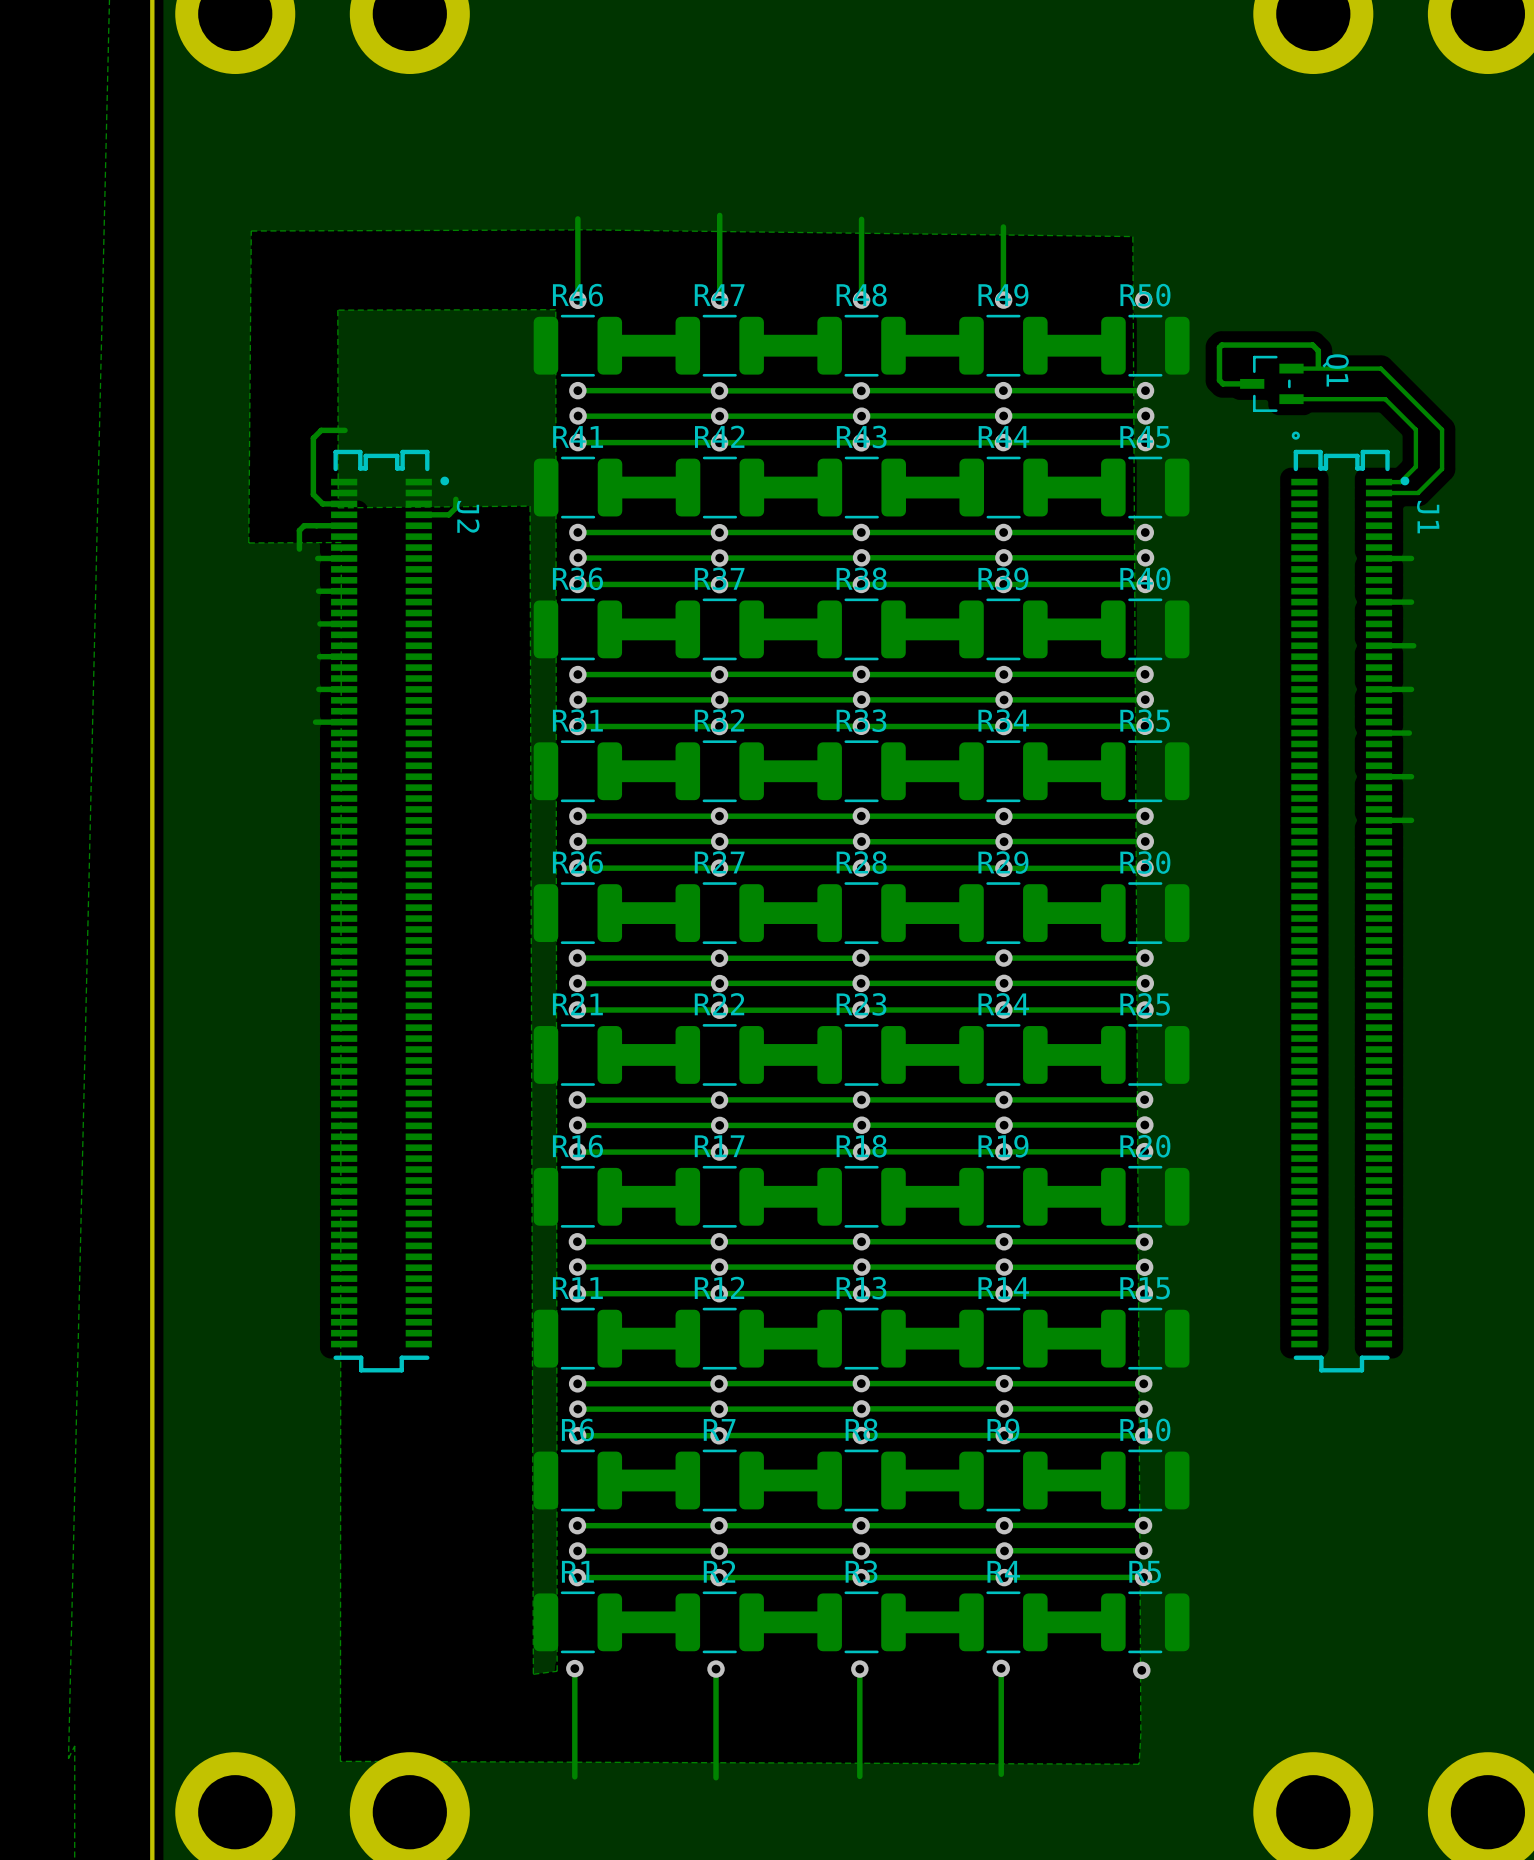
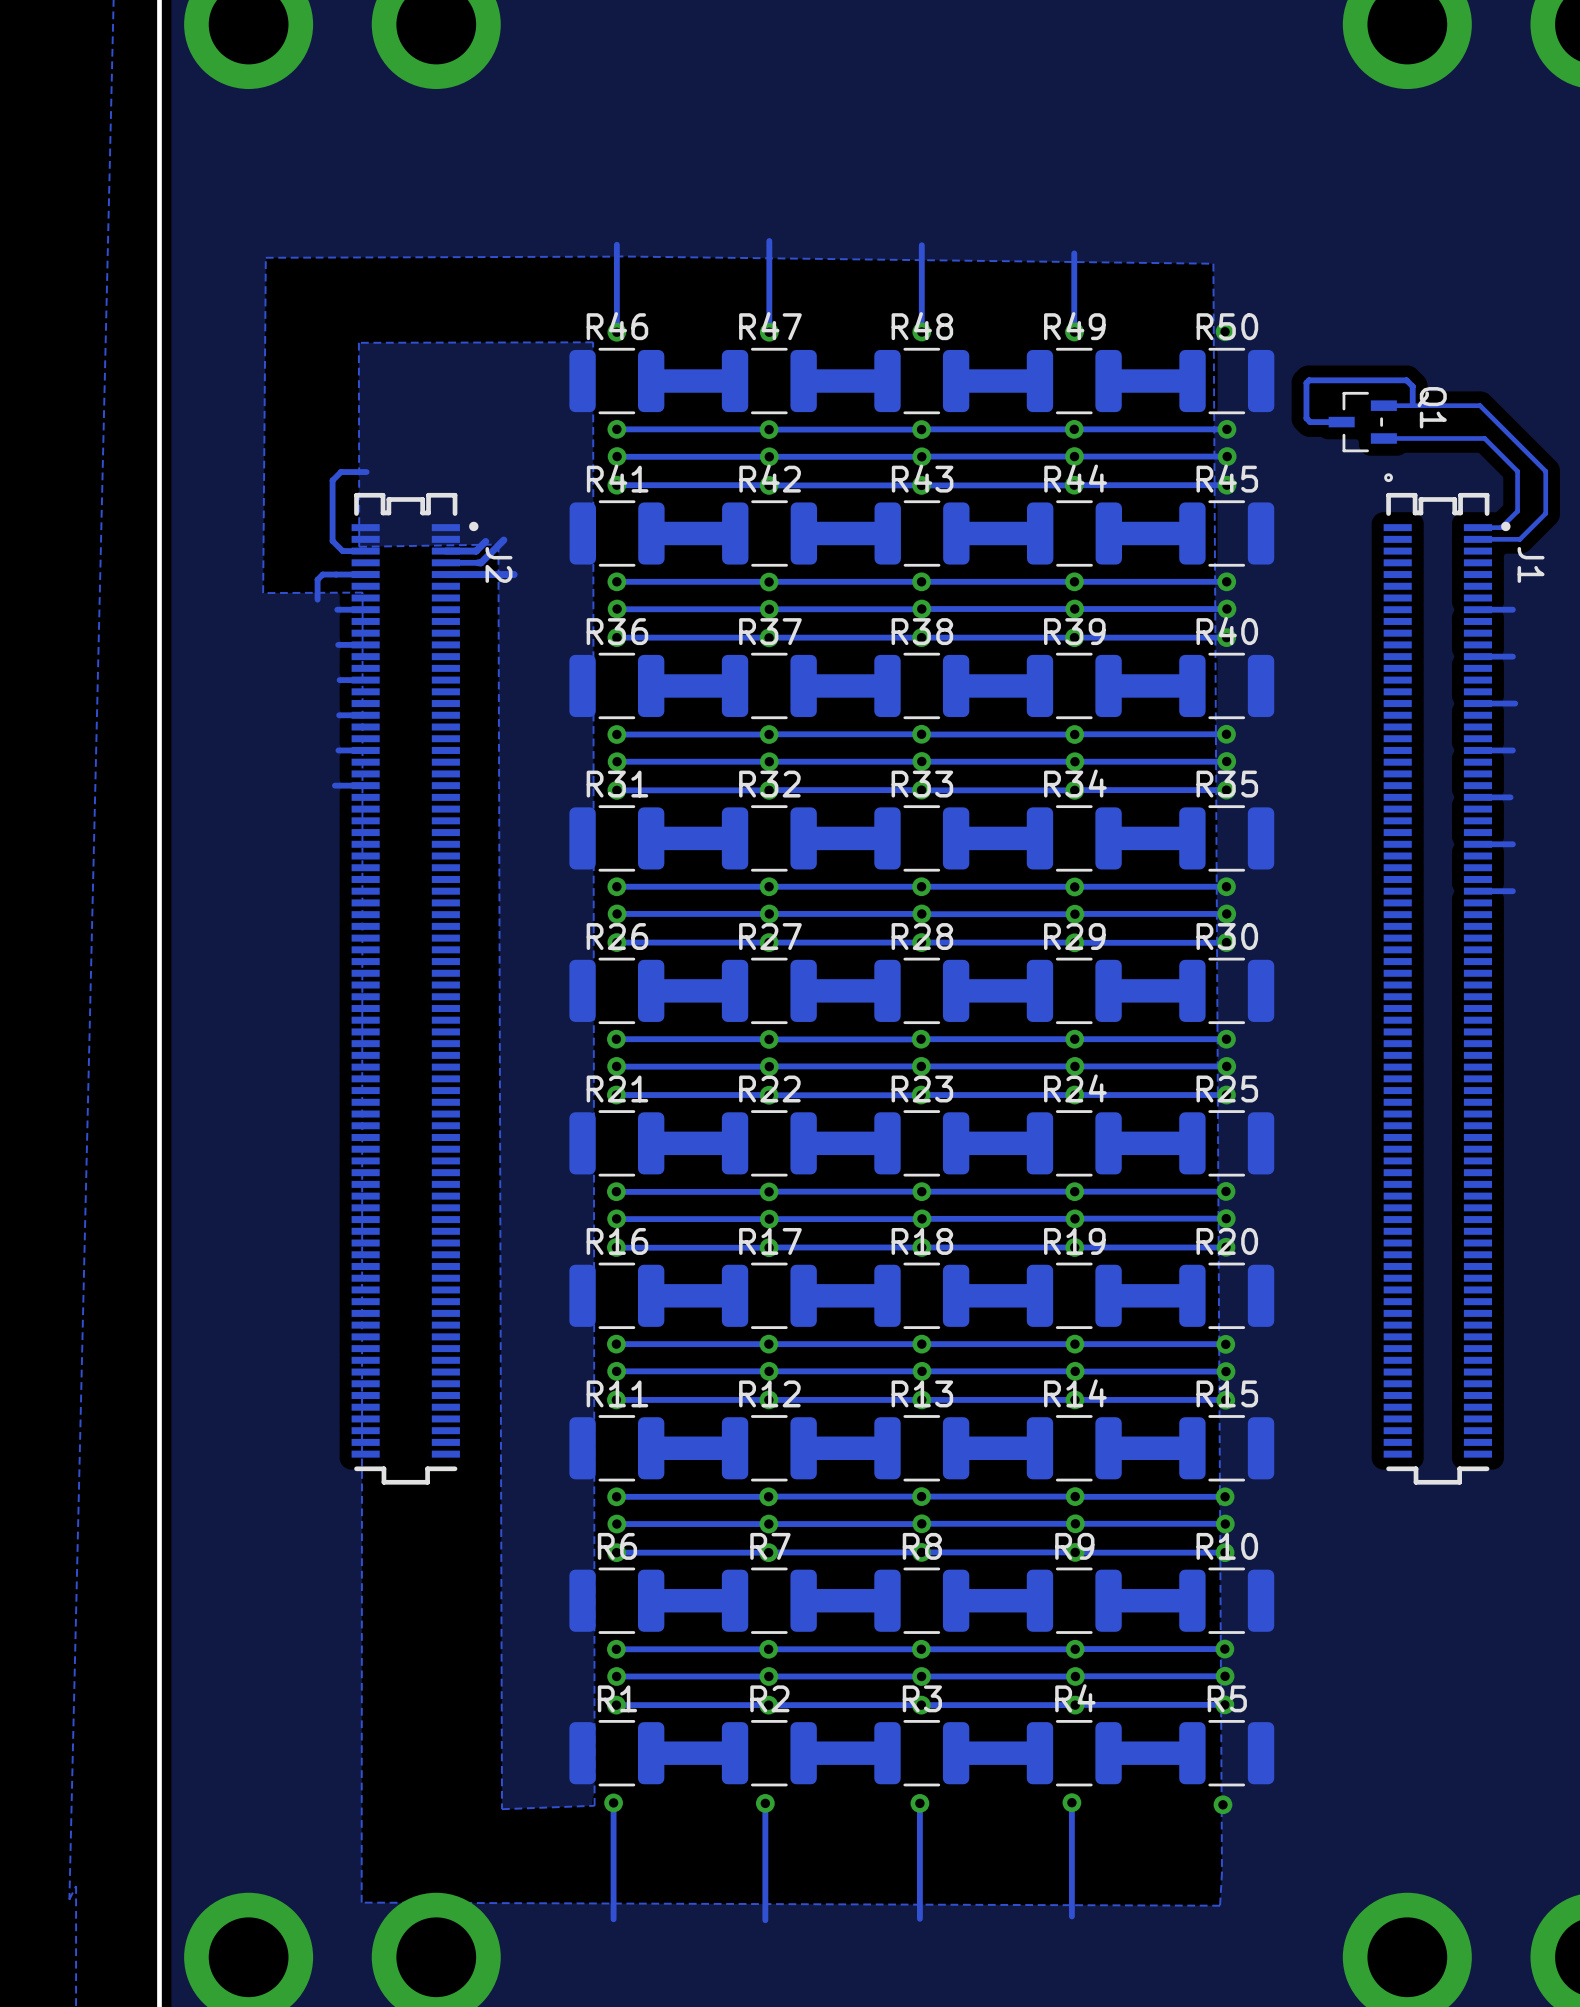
zone outline: (337, 310) (338, 507) (530, 506) (533, 1674) (557, 1671) -> (358, 342) (359, 546) (498, 544) (502, 1809) (594, 1805)
track: none -> (485, 541) (476, 551) (445, 551)
track: (455, 499) (455, 507) (448, 514) -> (503, 540) (481, 562) (478, 562)
track: none -> (514, 574) (445, 574)

